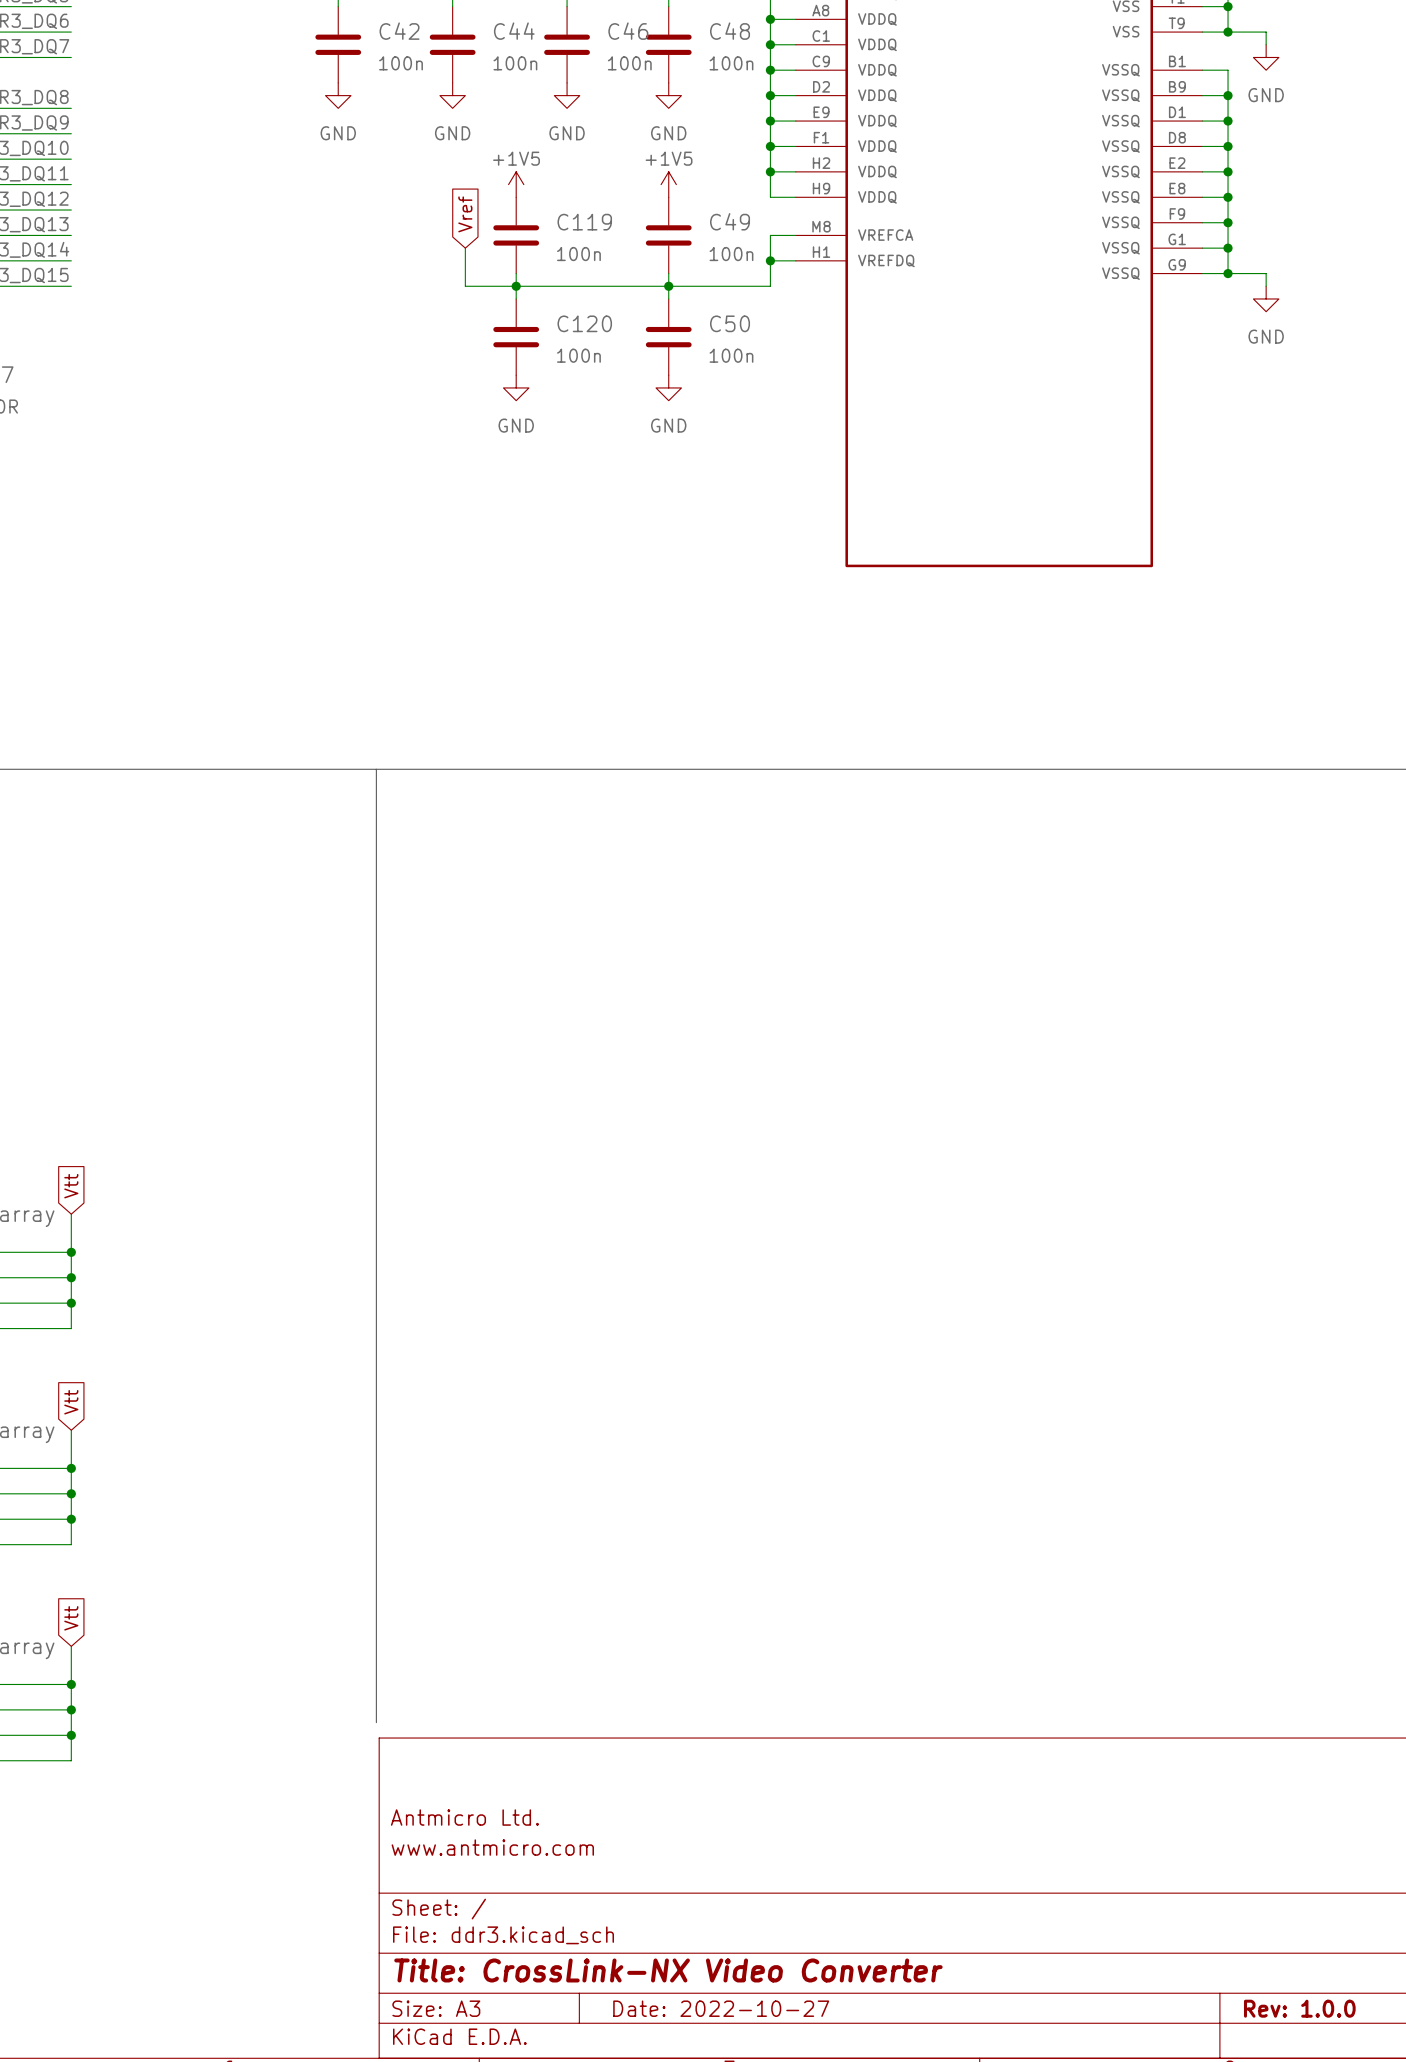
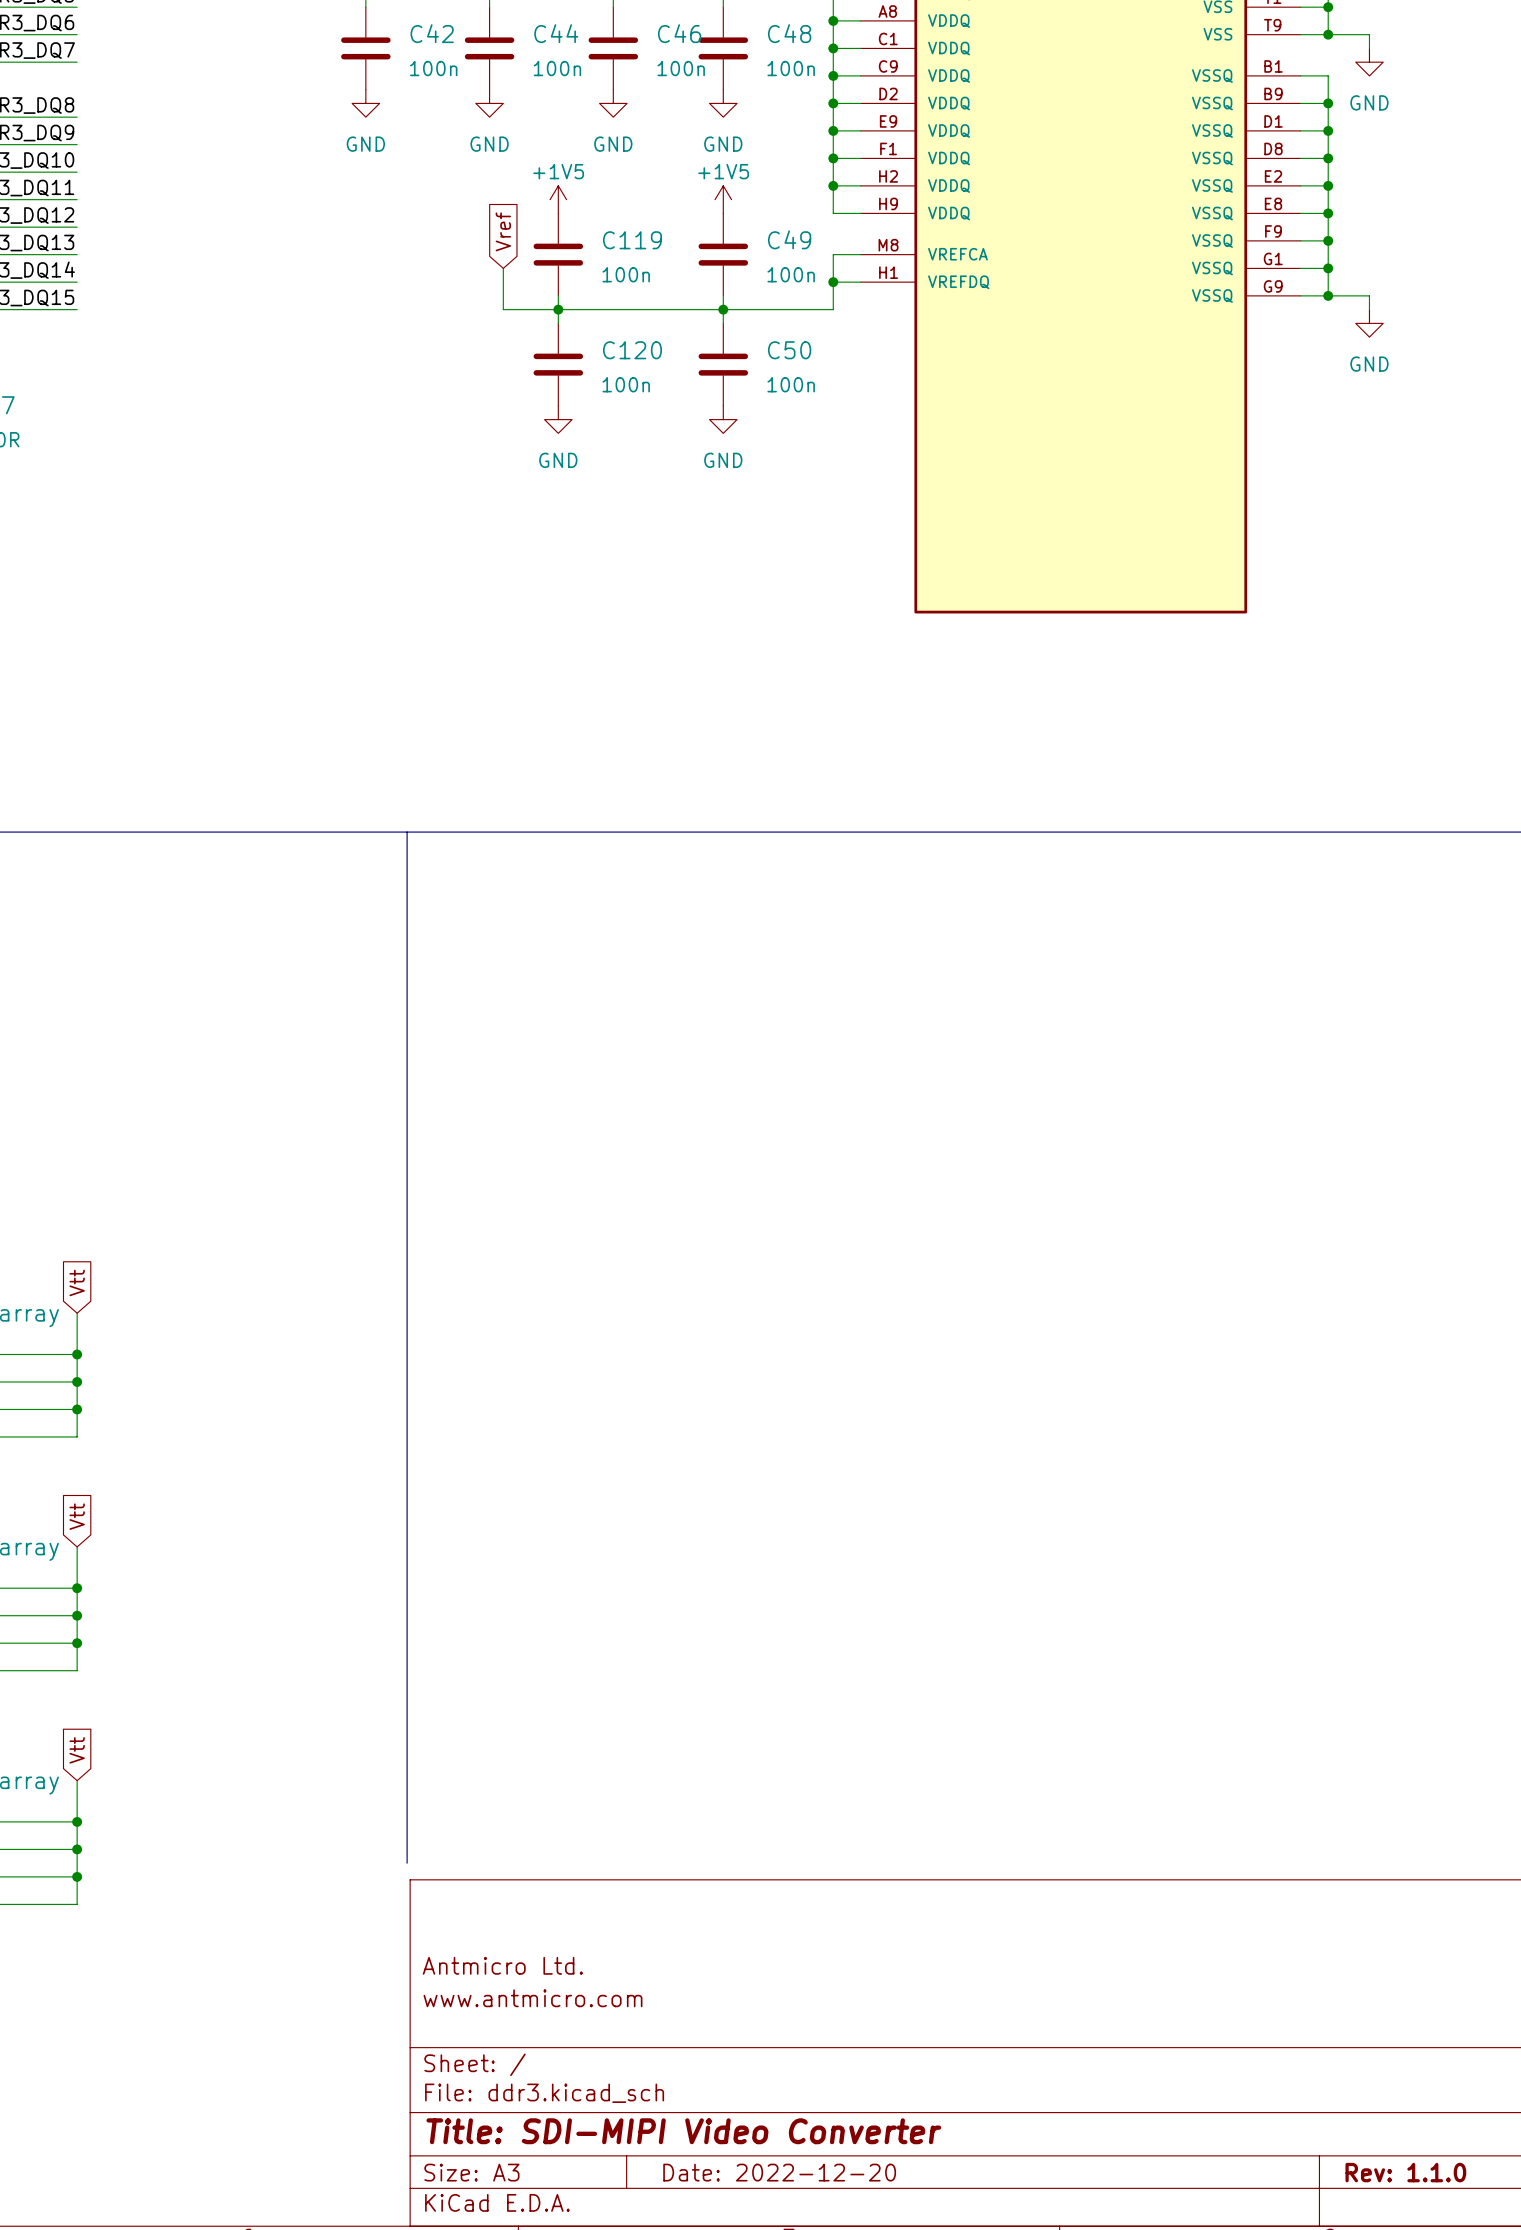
title block: Title: CrossLink-NX Video Converter (668, 1970) -> Title: SDI-MIPI Video Converter (683, 2131)
title block: Date: 2022-10-27 (721, 2008) -> Date: 2022-12-20 (779, 2172)
title block: Rev: 1.0.0 (1299, 2008) -> Rev: 1.1.0 (1405, 2172)

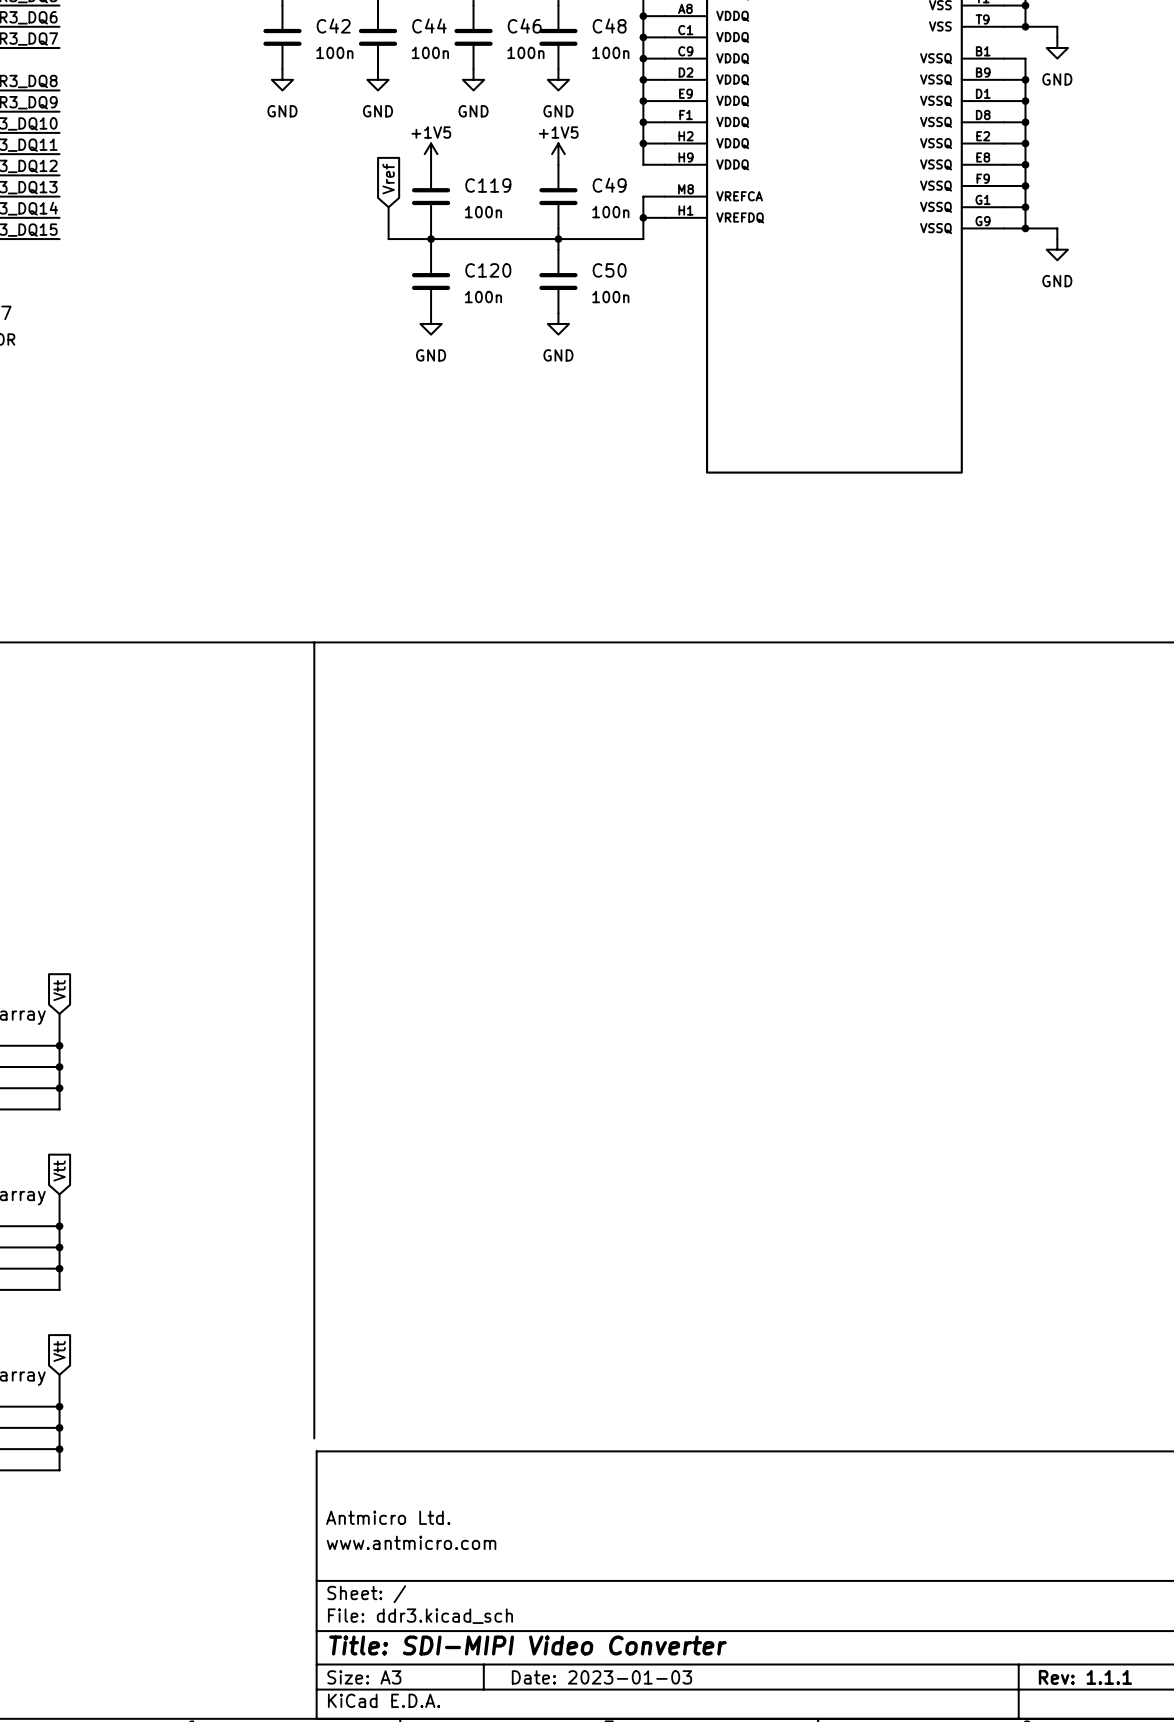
title block: Date: 2022-12-20 (779, 2172) -> Date: 2023-01-03 (601, 1677)
title block: Rev: 1.1.0 (1405, 2172) -> Rev: 1.1.1 (1085, 1677)

